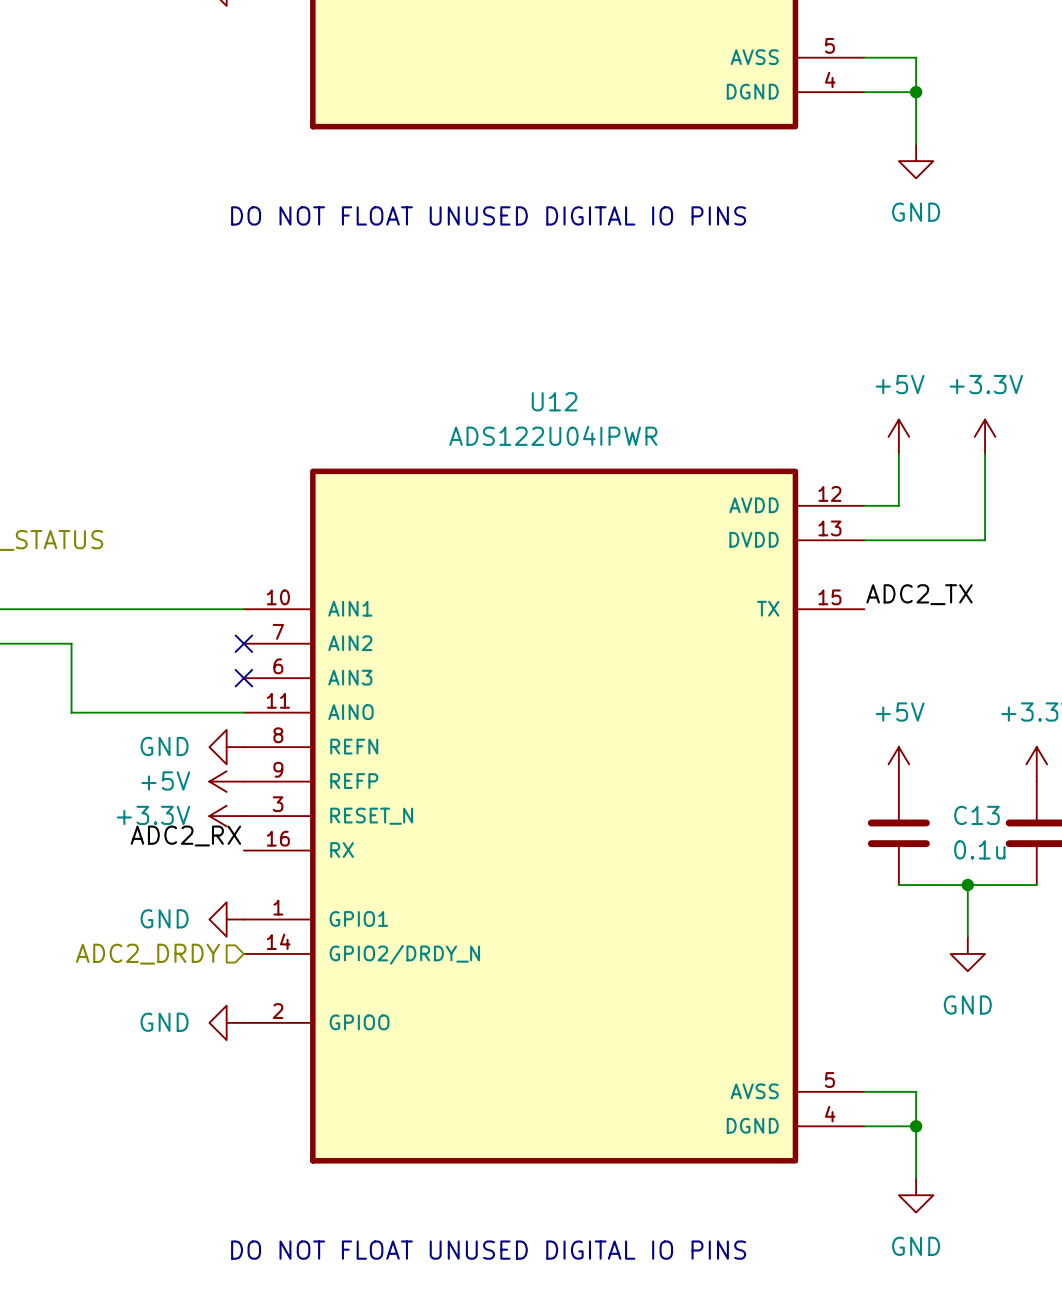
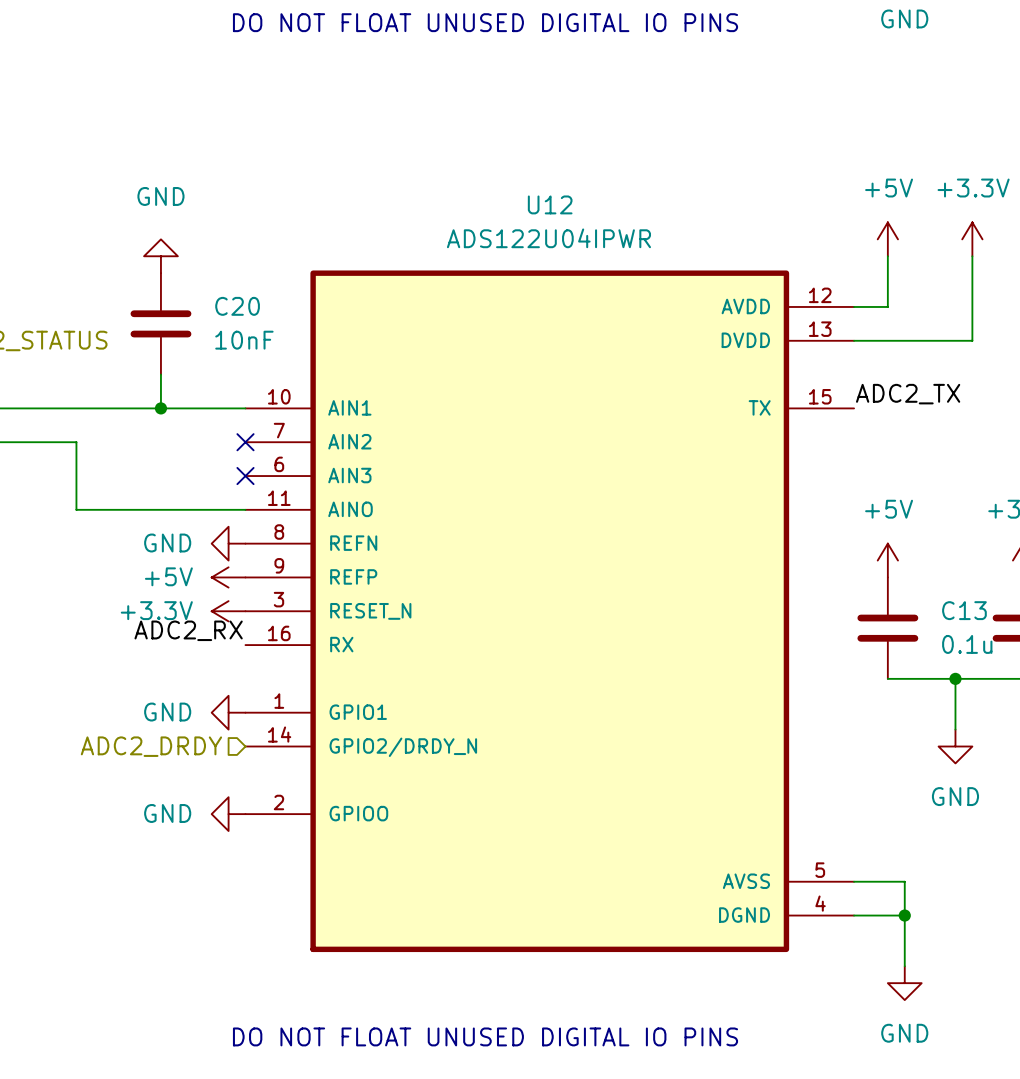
power symbol: none -> GND (160, 256)
C20: none -> 10nF (160, 323)
wire: none -> (160, 374) (160, 408)
junction: none -> (160, 408)

